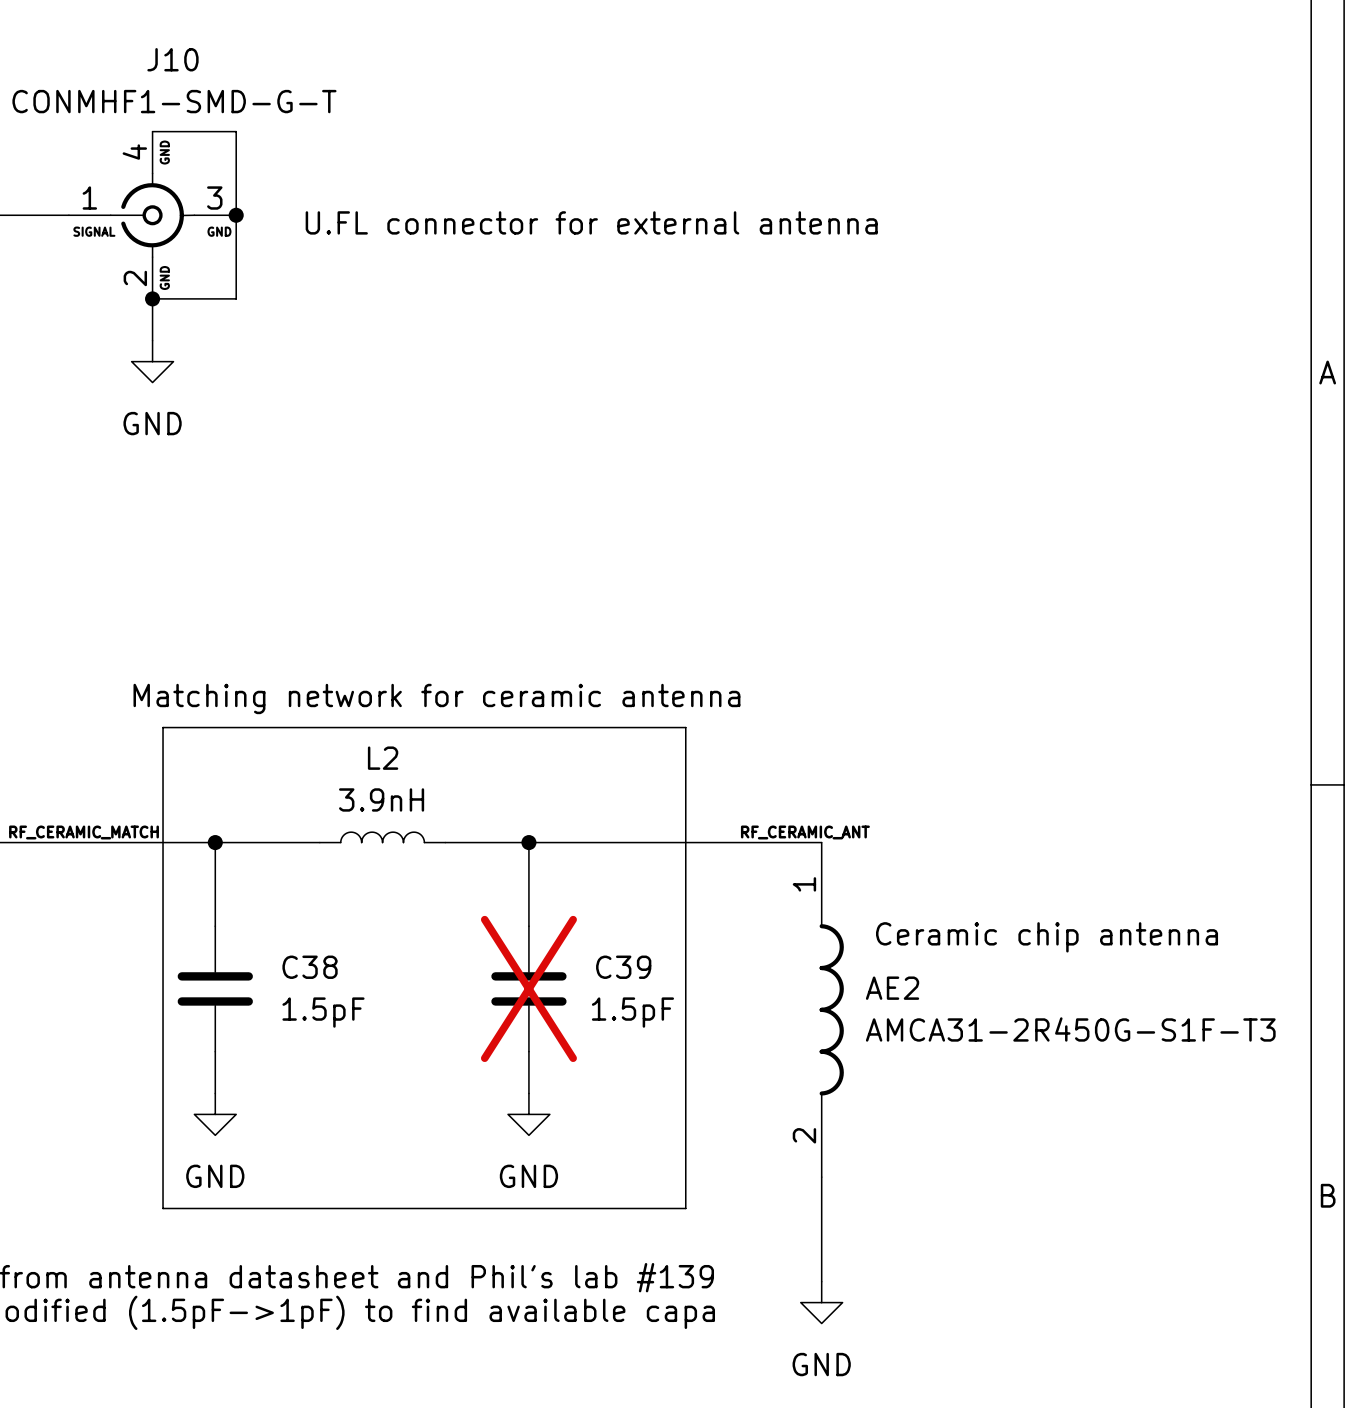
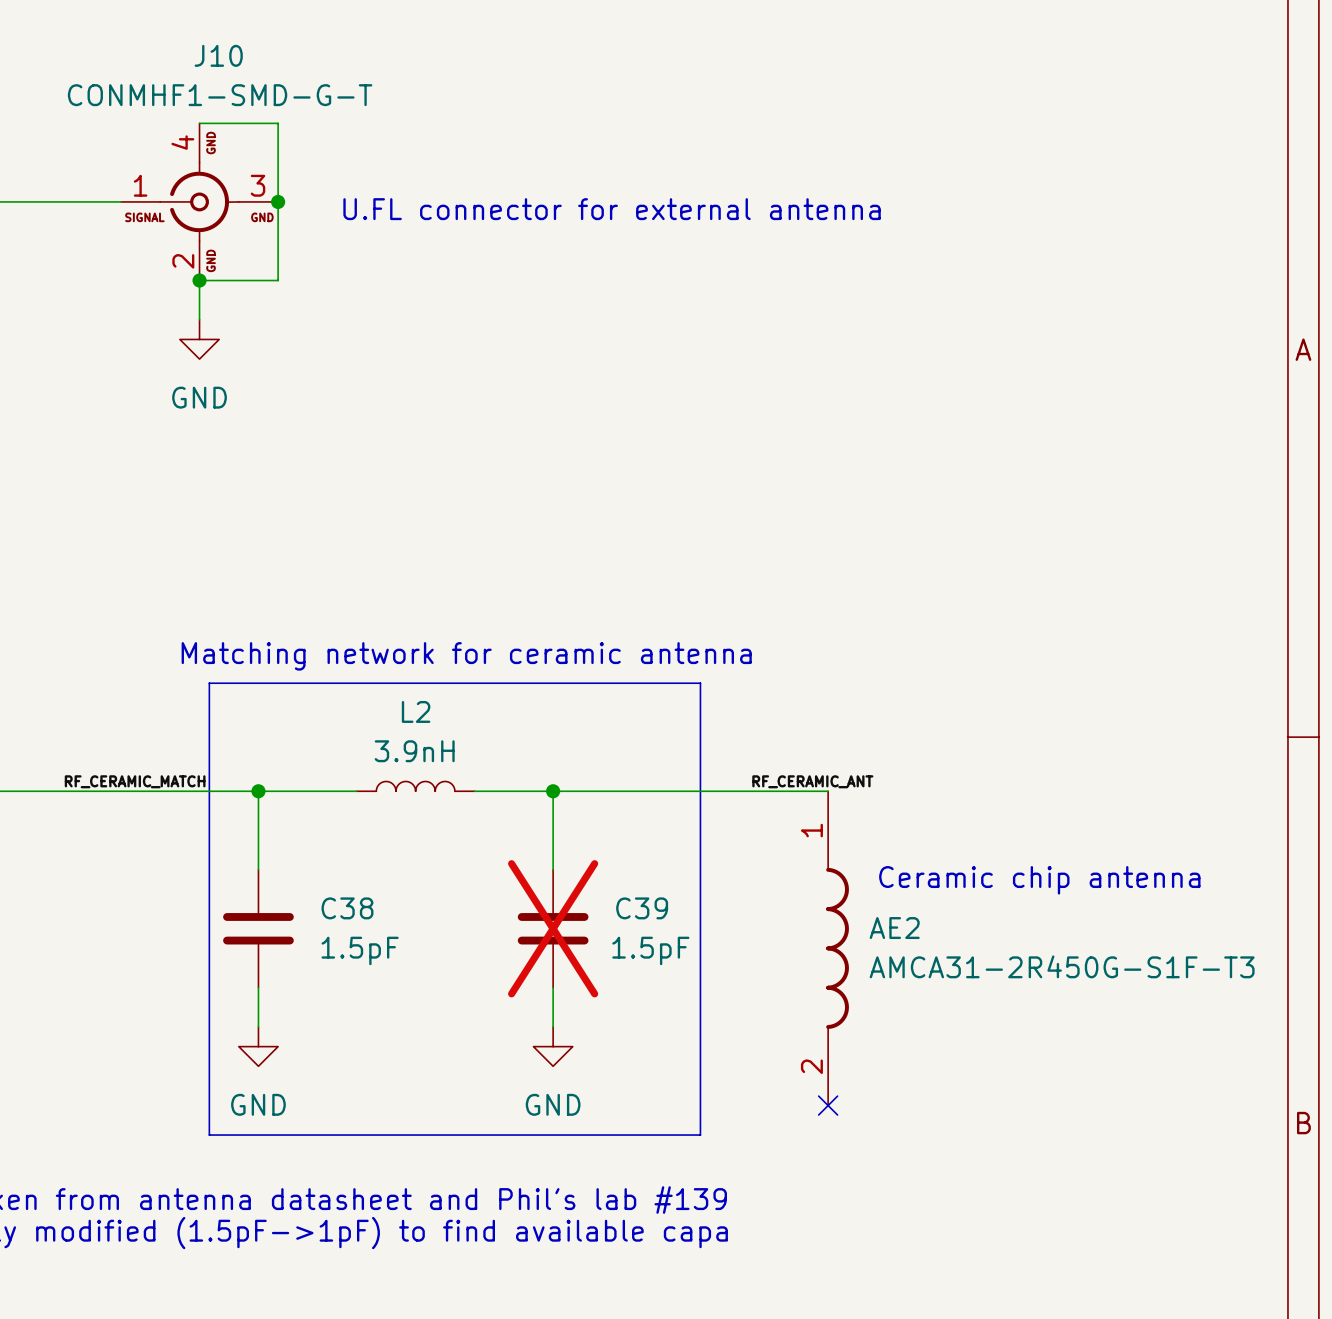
wire: (821, 1177) (821, 1281) -> none
no-connect mark: none -> (828, 1105)
power symbol: GND (821, 1302) -> none

